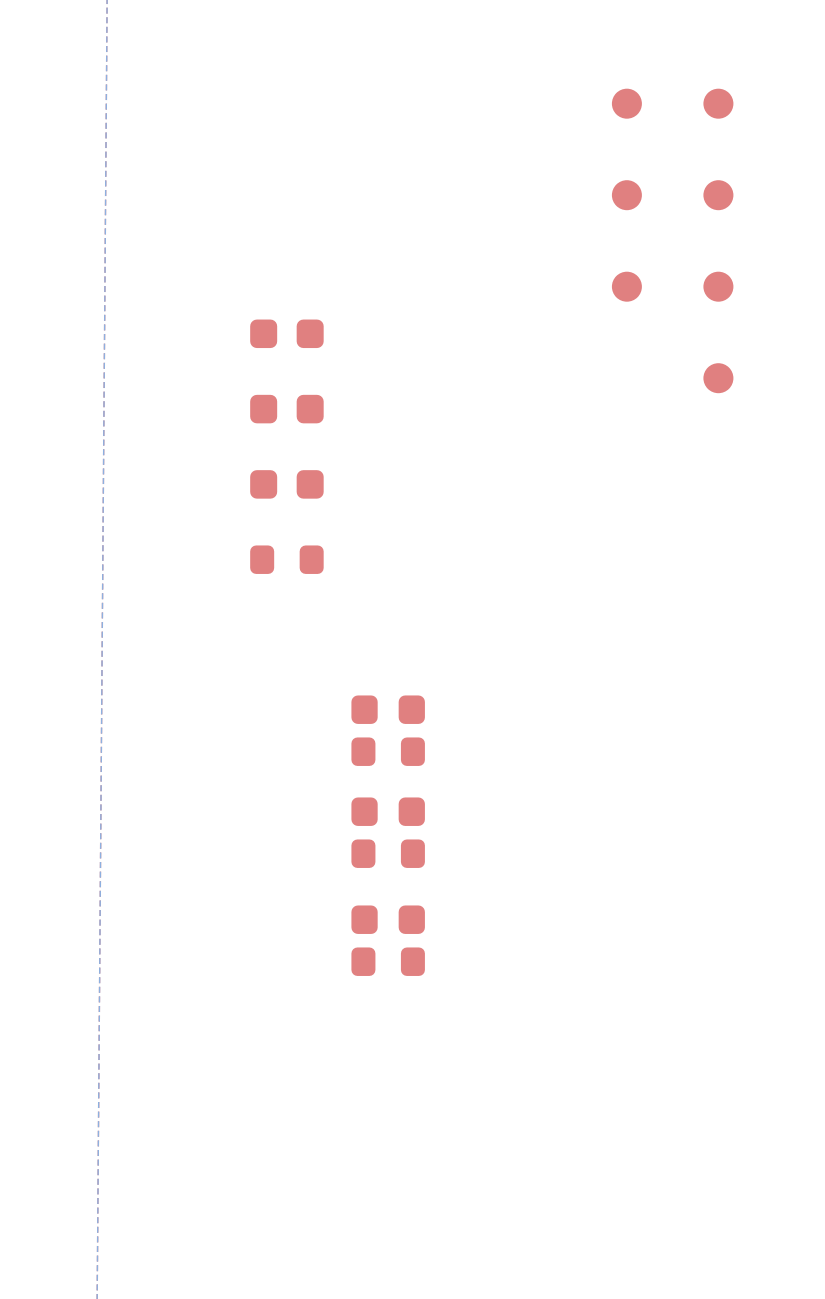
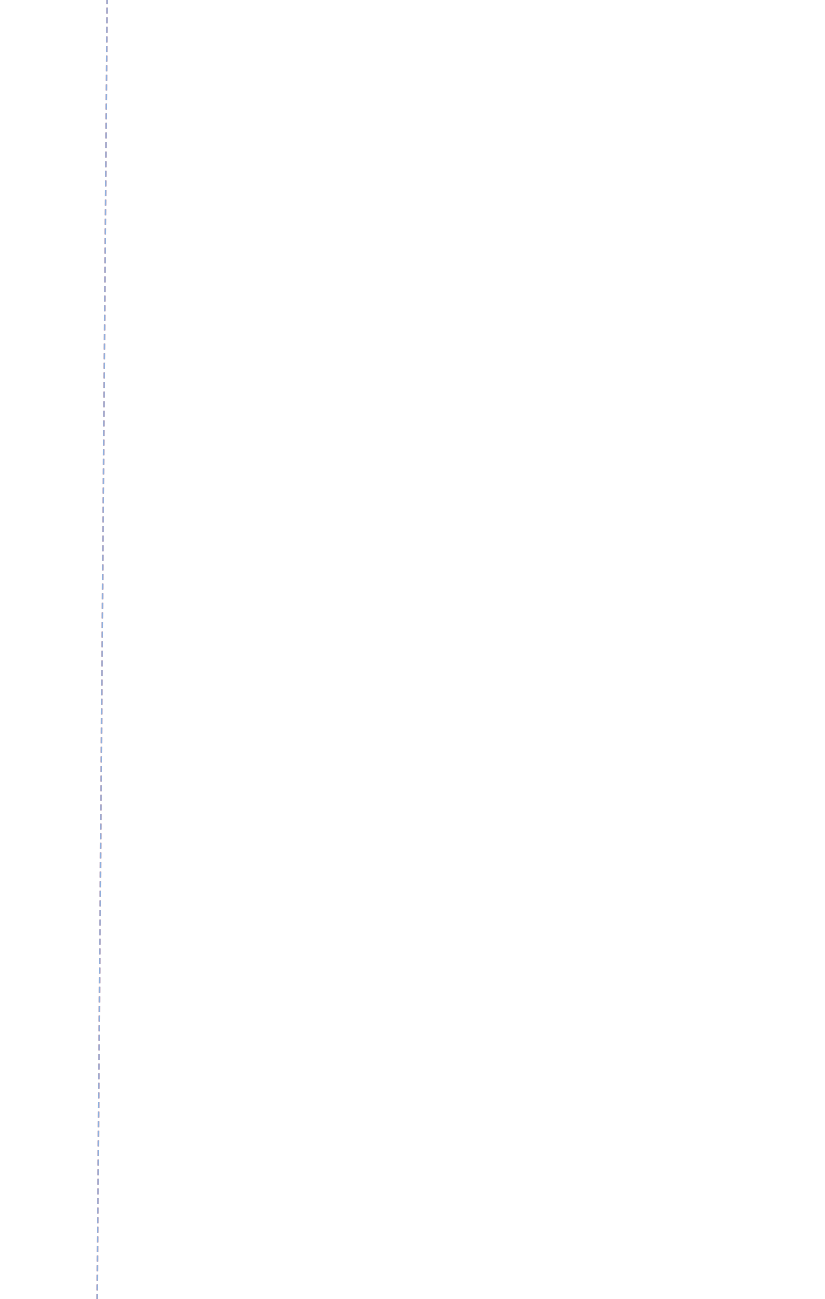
part: (626, 103) -> none
part: (718, 103) -> none
part: (626, 195) -> none
part: (718, 195) -> none
part: (626, 286) -> none
part: (718, 286) -> none
part: (286, 333) -> none
part: (718, 378) -> none
part: (286, 409) -> none
part: (286, 484) -> none
part: (286, 559) -> none
part: (388, 709) -> none
part: (388, 751) -> none
part: (388, 811) -> none
part: (388, 853) -> none
part: (388, 919) -> none
part: (388, 961) -> none

